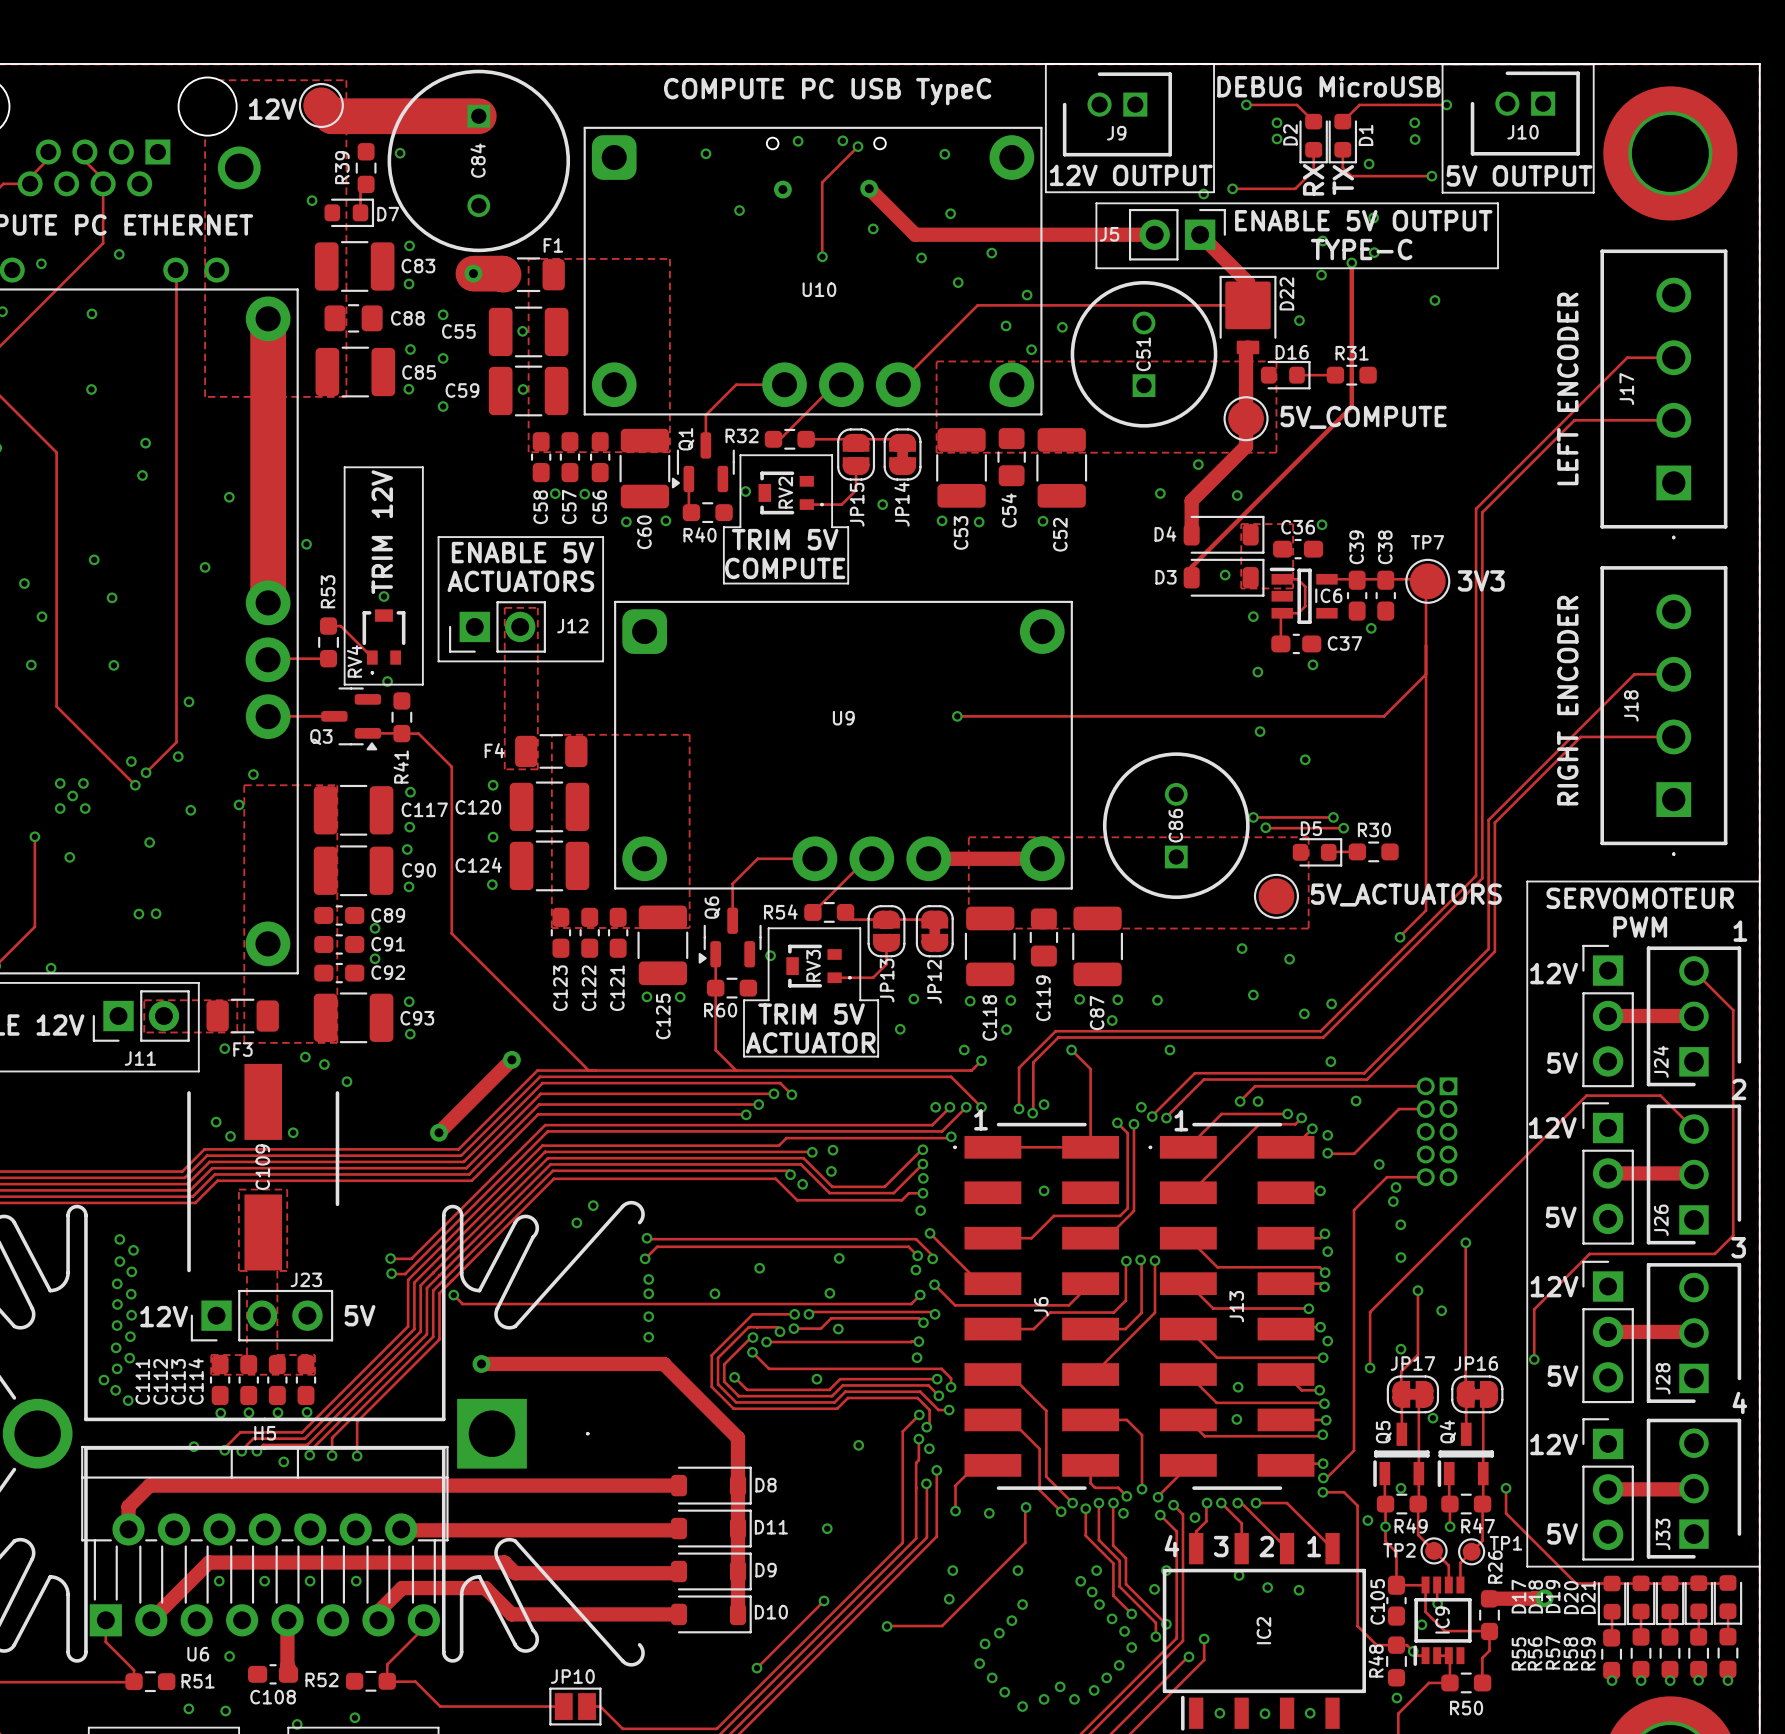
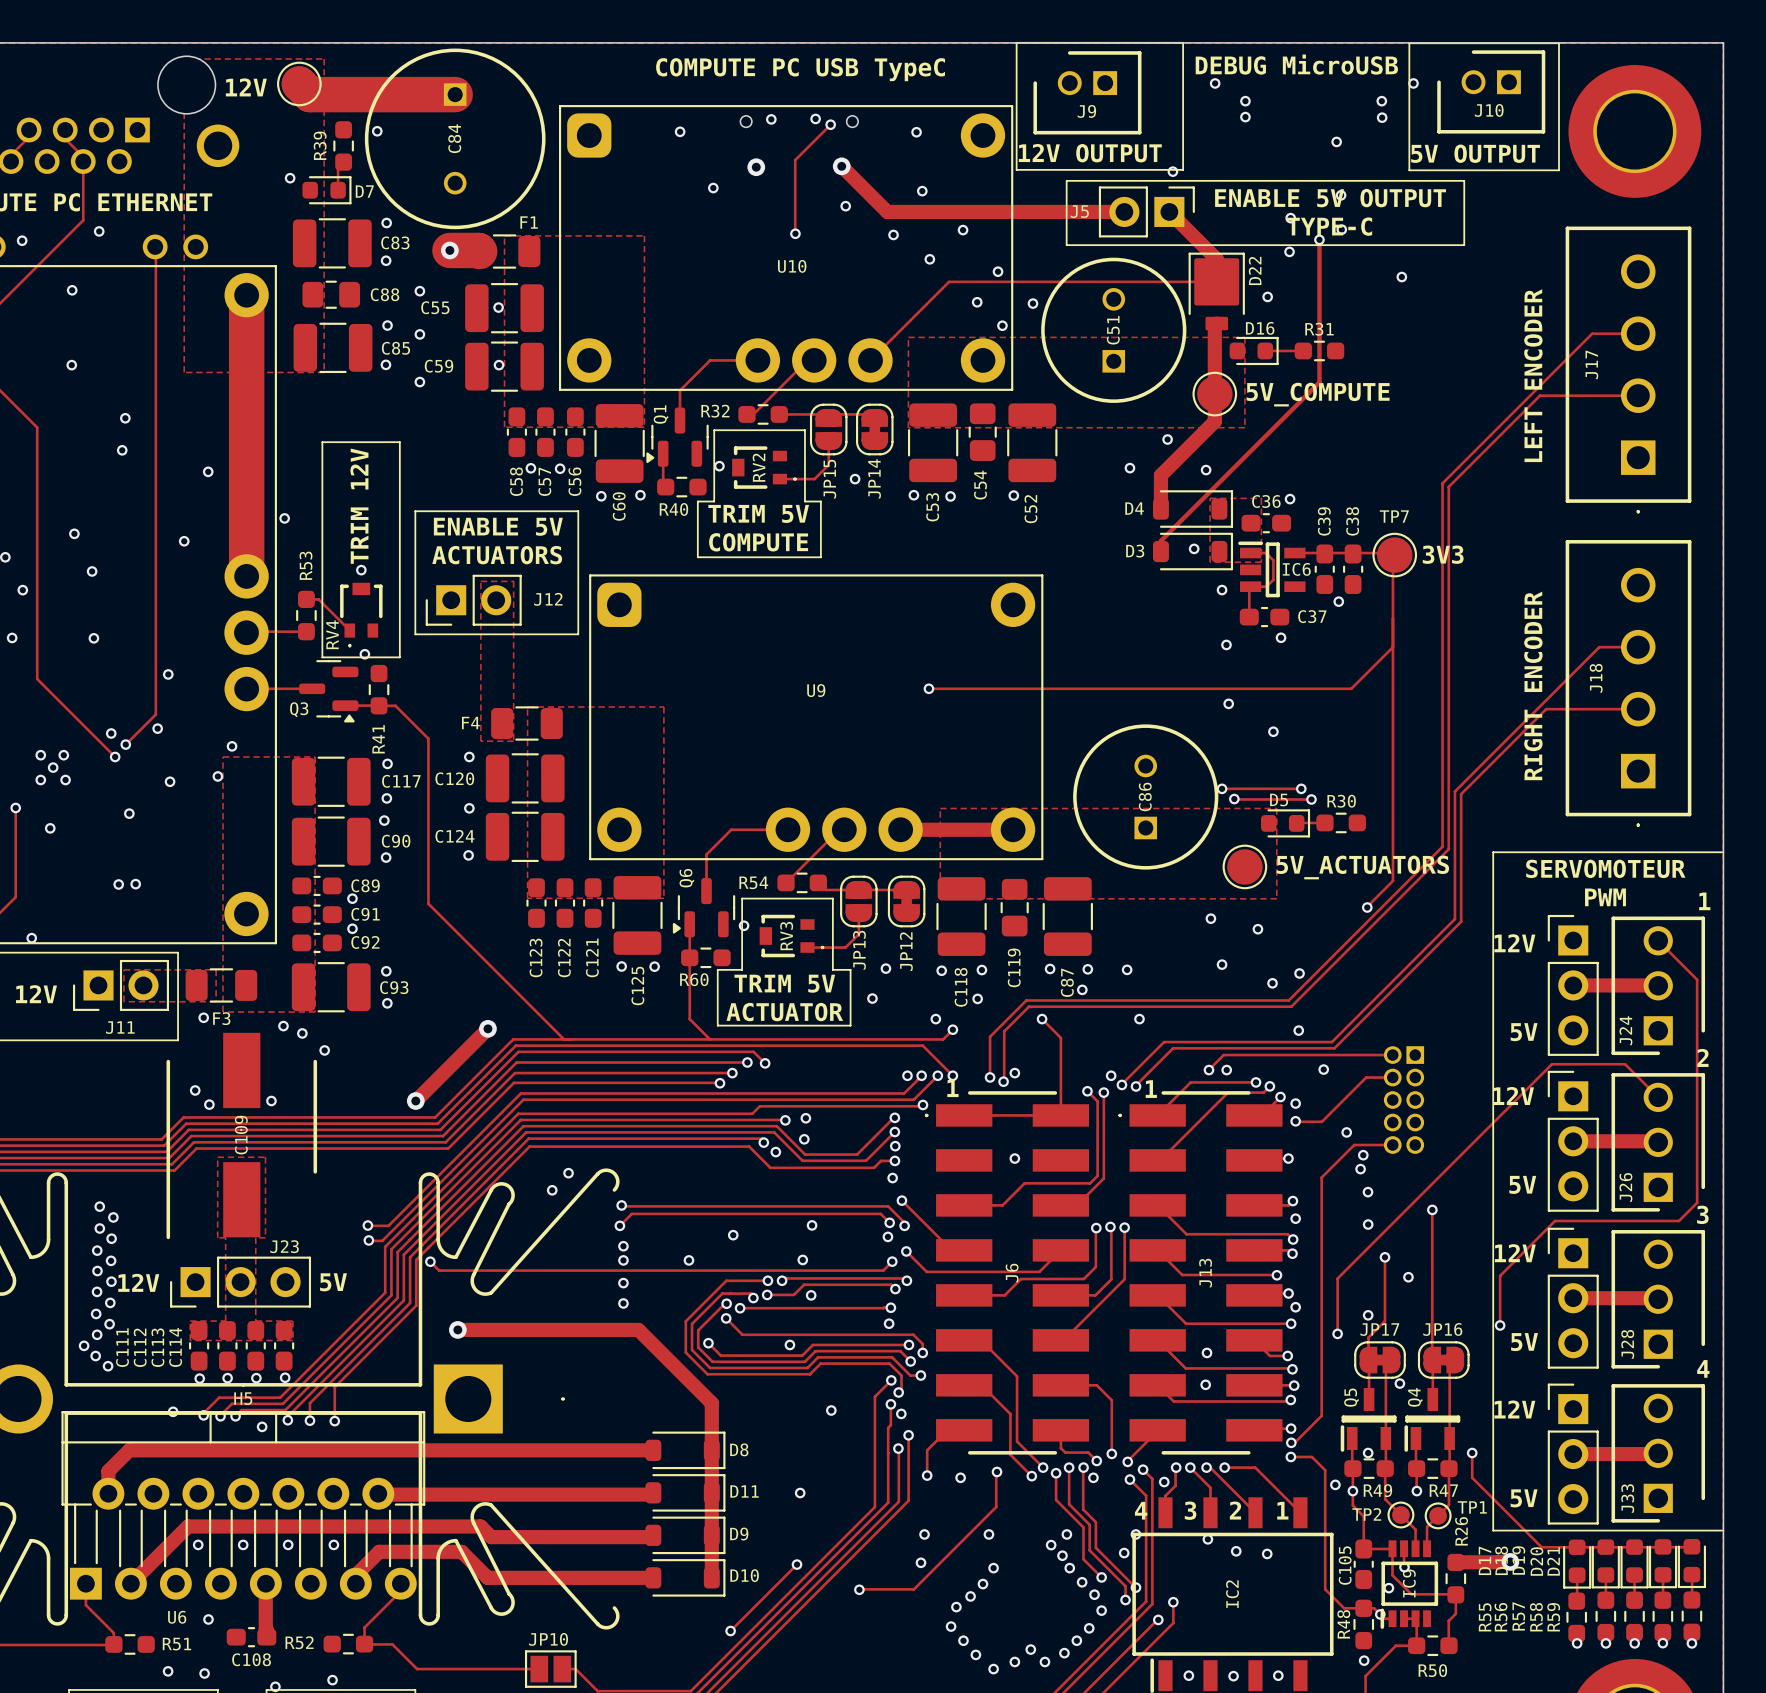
track: (1246, 104) (1296, 104) (1313, 121) -> none
track: (1446, 104) (1359, 104) (1342, 121) -> none
D2: (1313, 138) -> none
D1: (1342, 138) -> none
track: (1313, 149) (1313, 170) (1295, 188) (1232, 188) -> none
track: (1342, 149) (1342, 167) (1351, 176) (1431, 176) -> none
via: (1431, 176) -> none
text: RX (1313, 179) -> none
text: TX (1343, 179) -> none
via: (1232, 188) -> none

